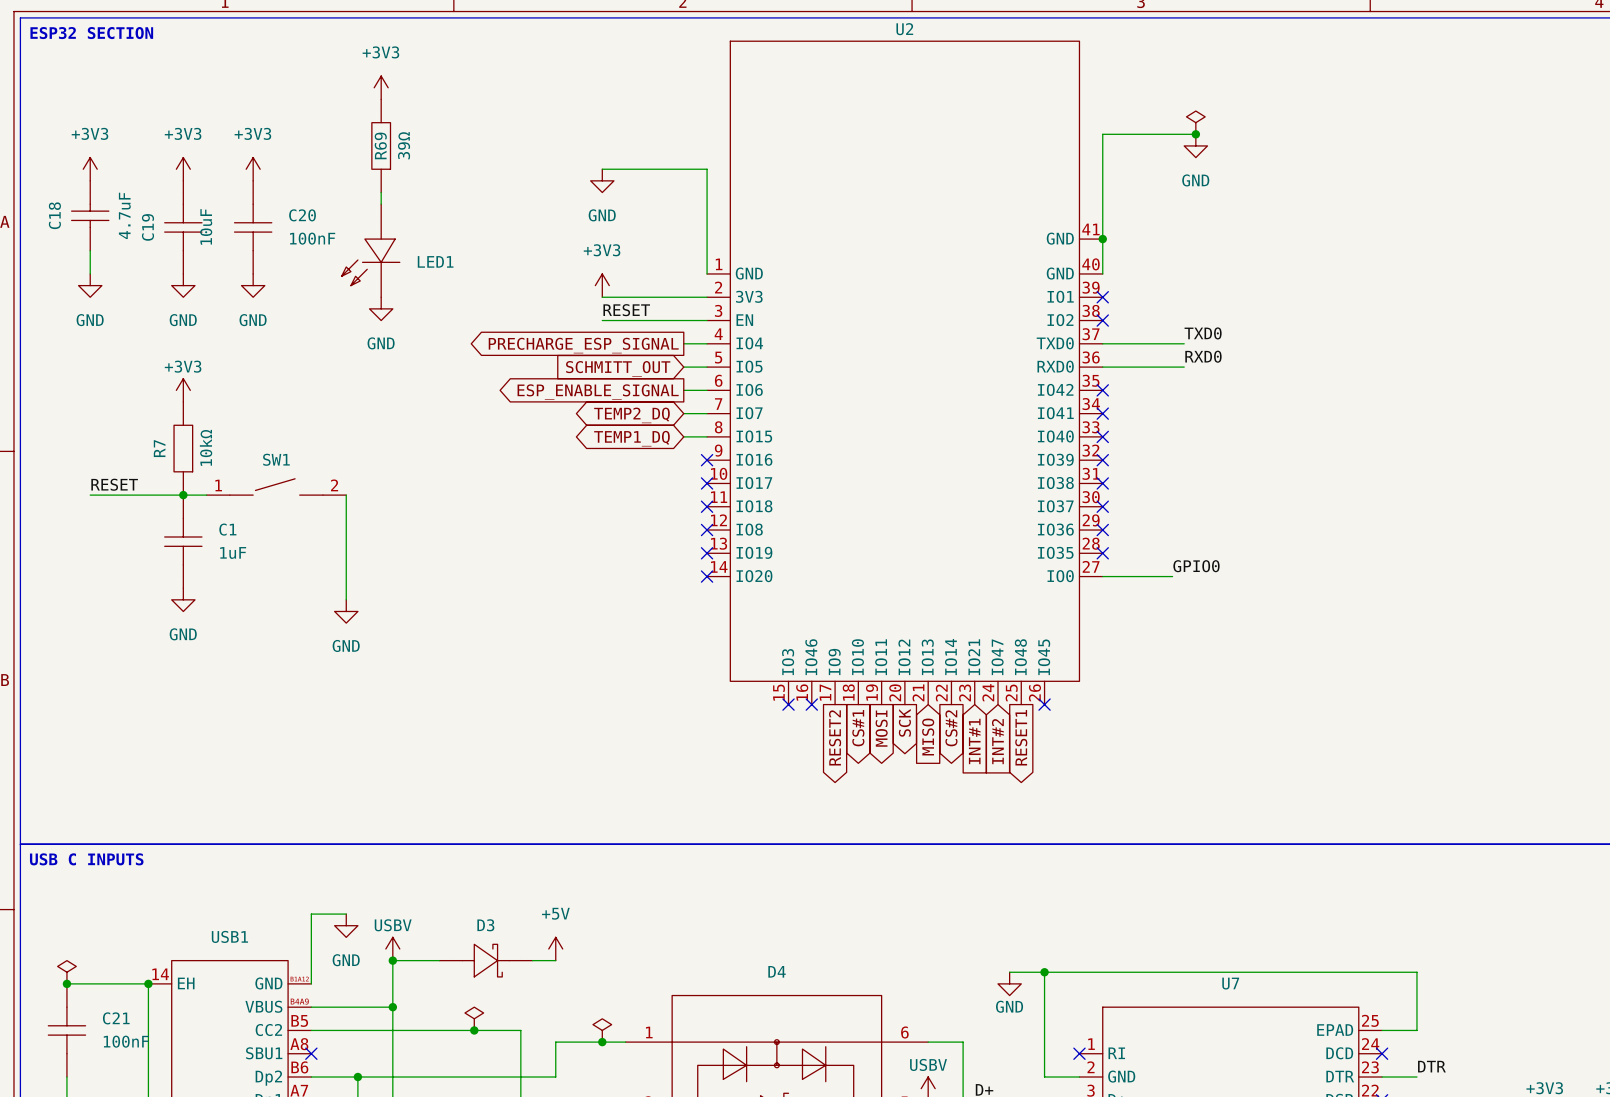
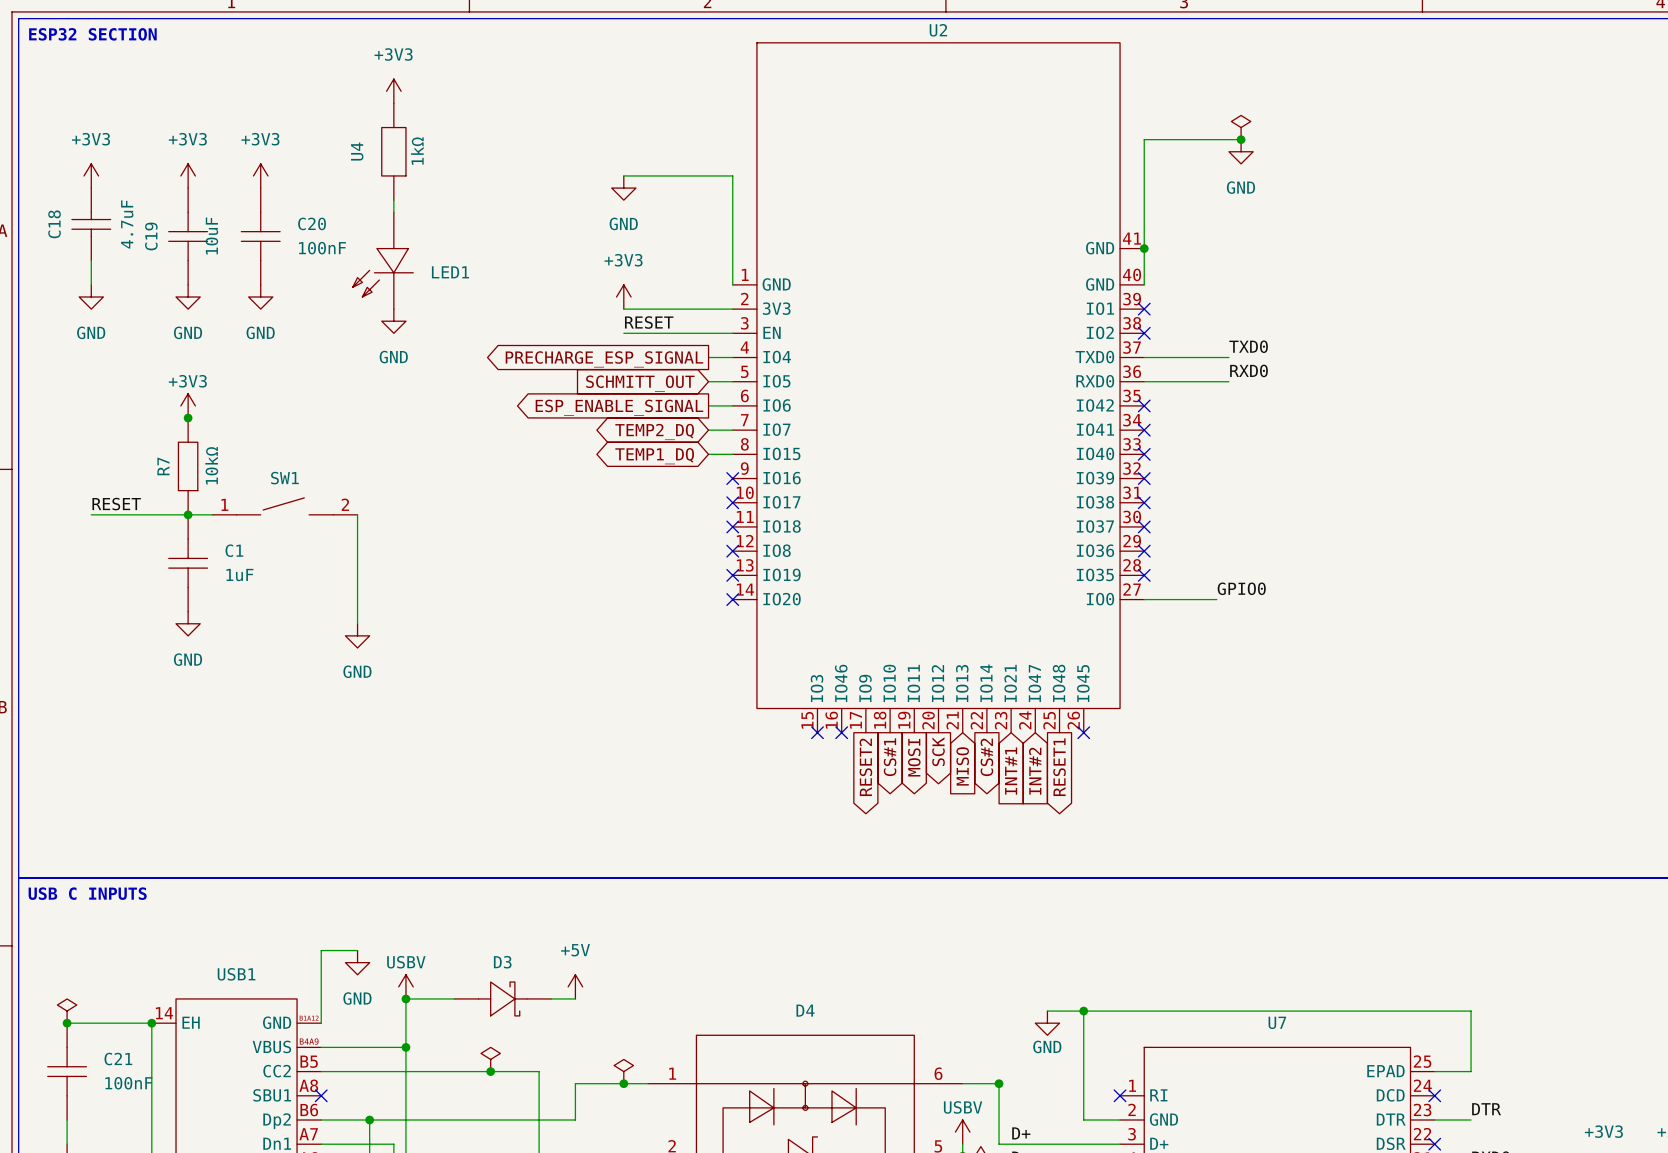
R69: 39Ω (381, 145) -> none
U4: none -> 1kΩ (393, 151)
junction: none -> (188, 418)
junction: none -> (999, 1083)

